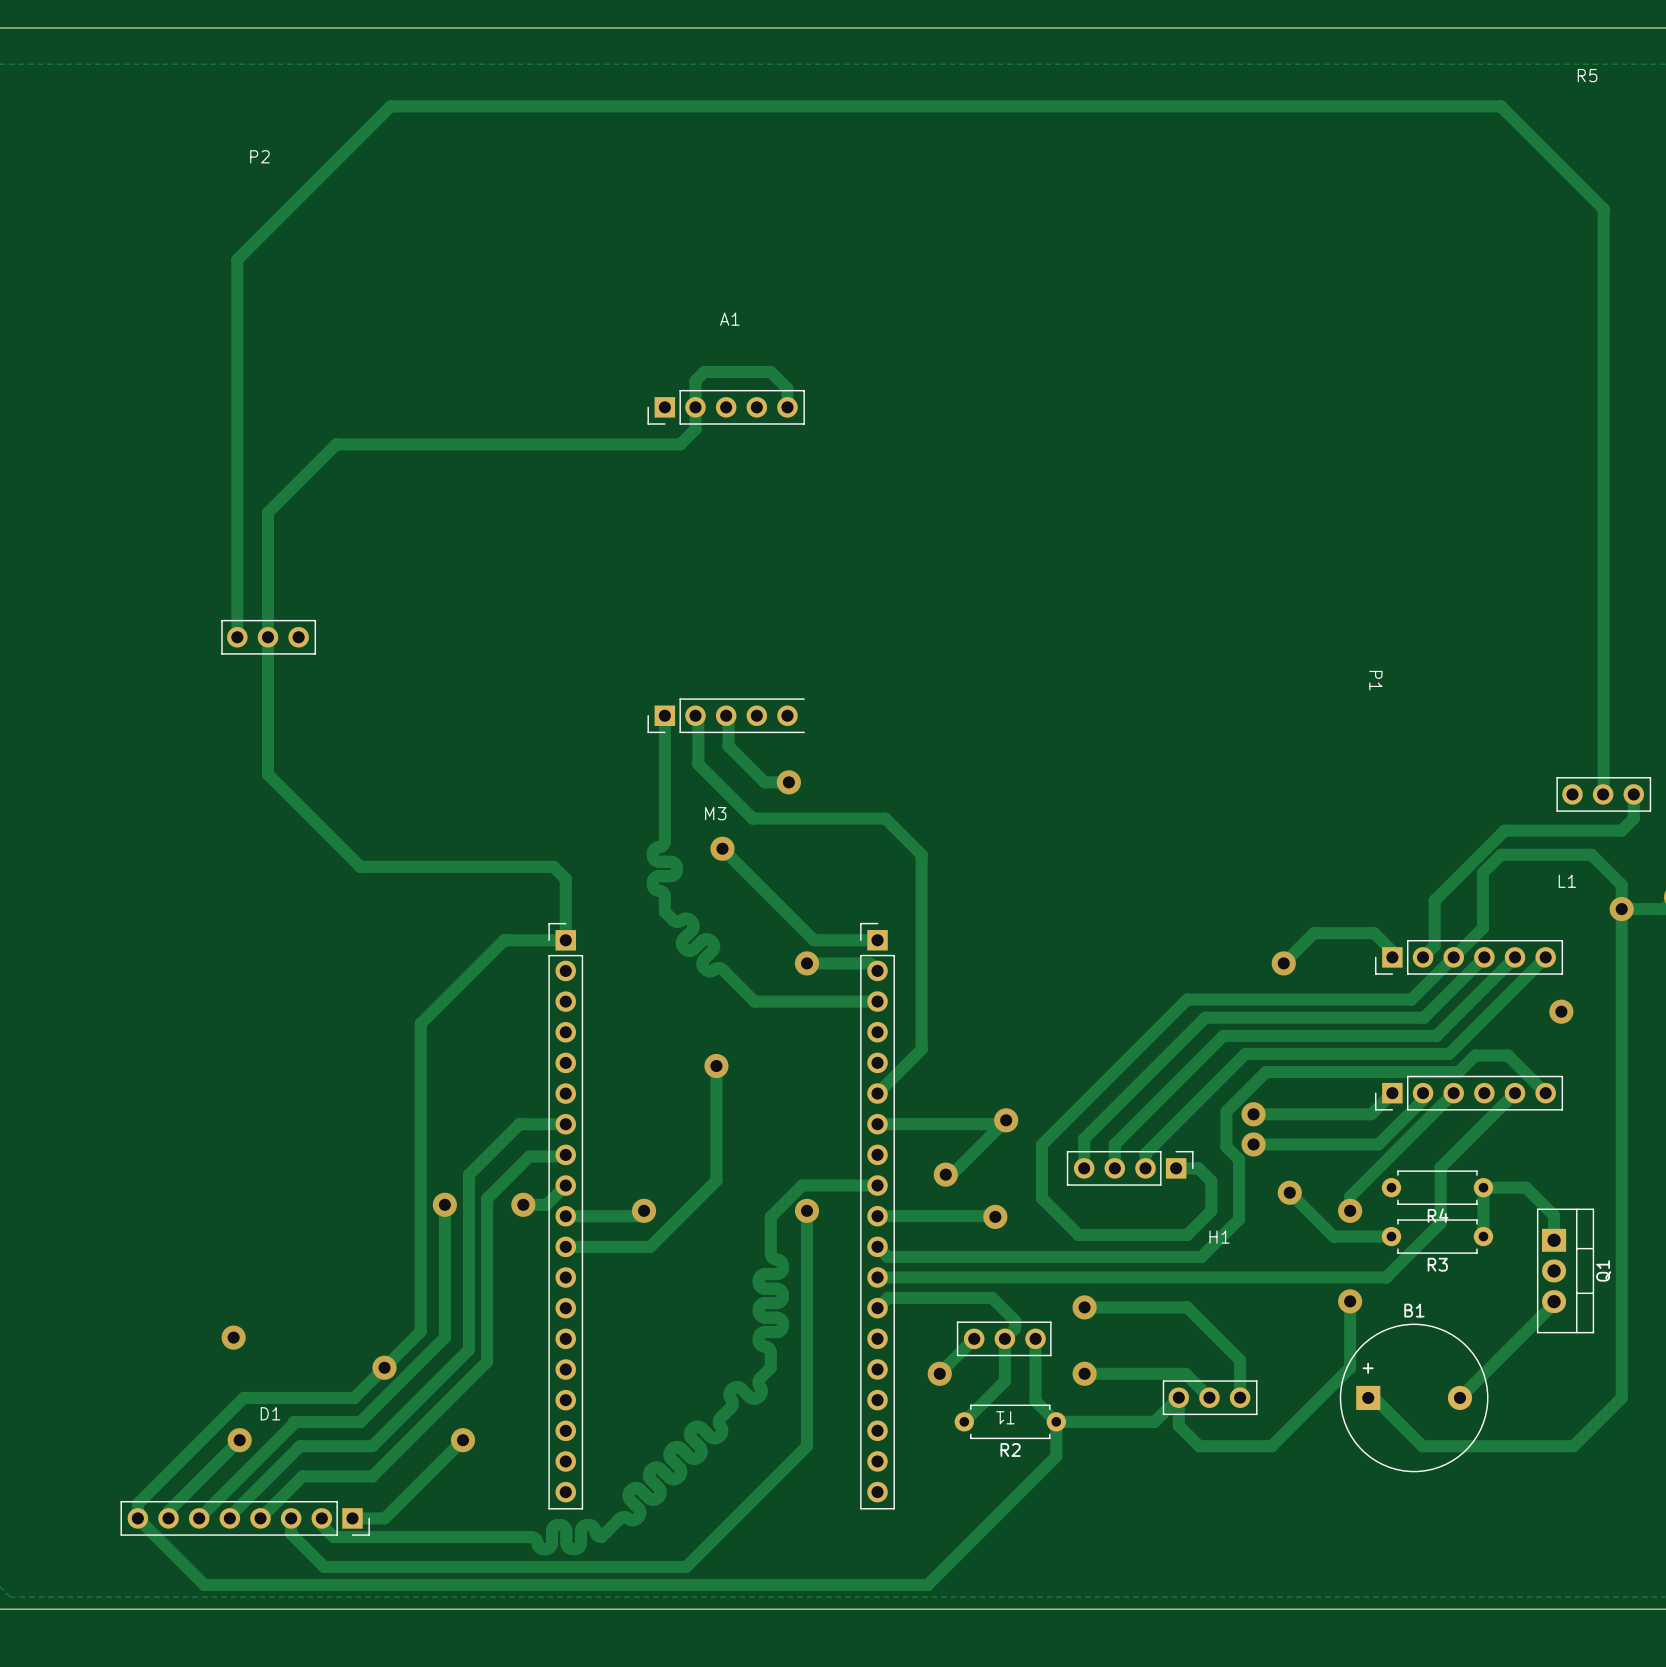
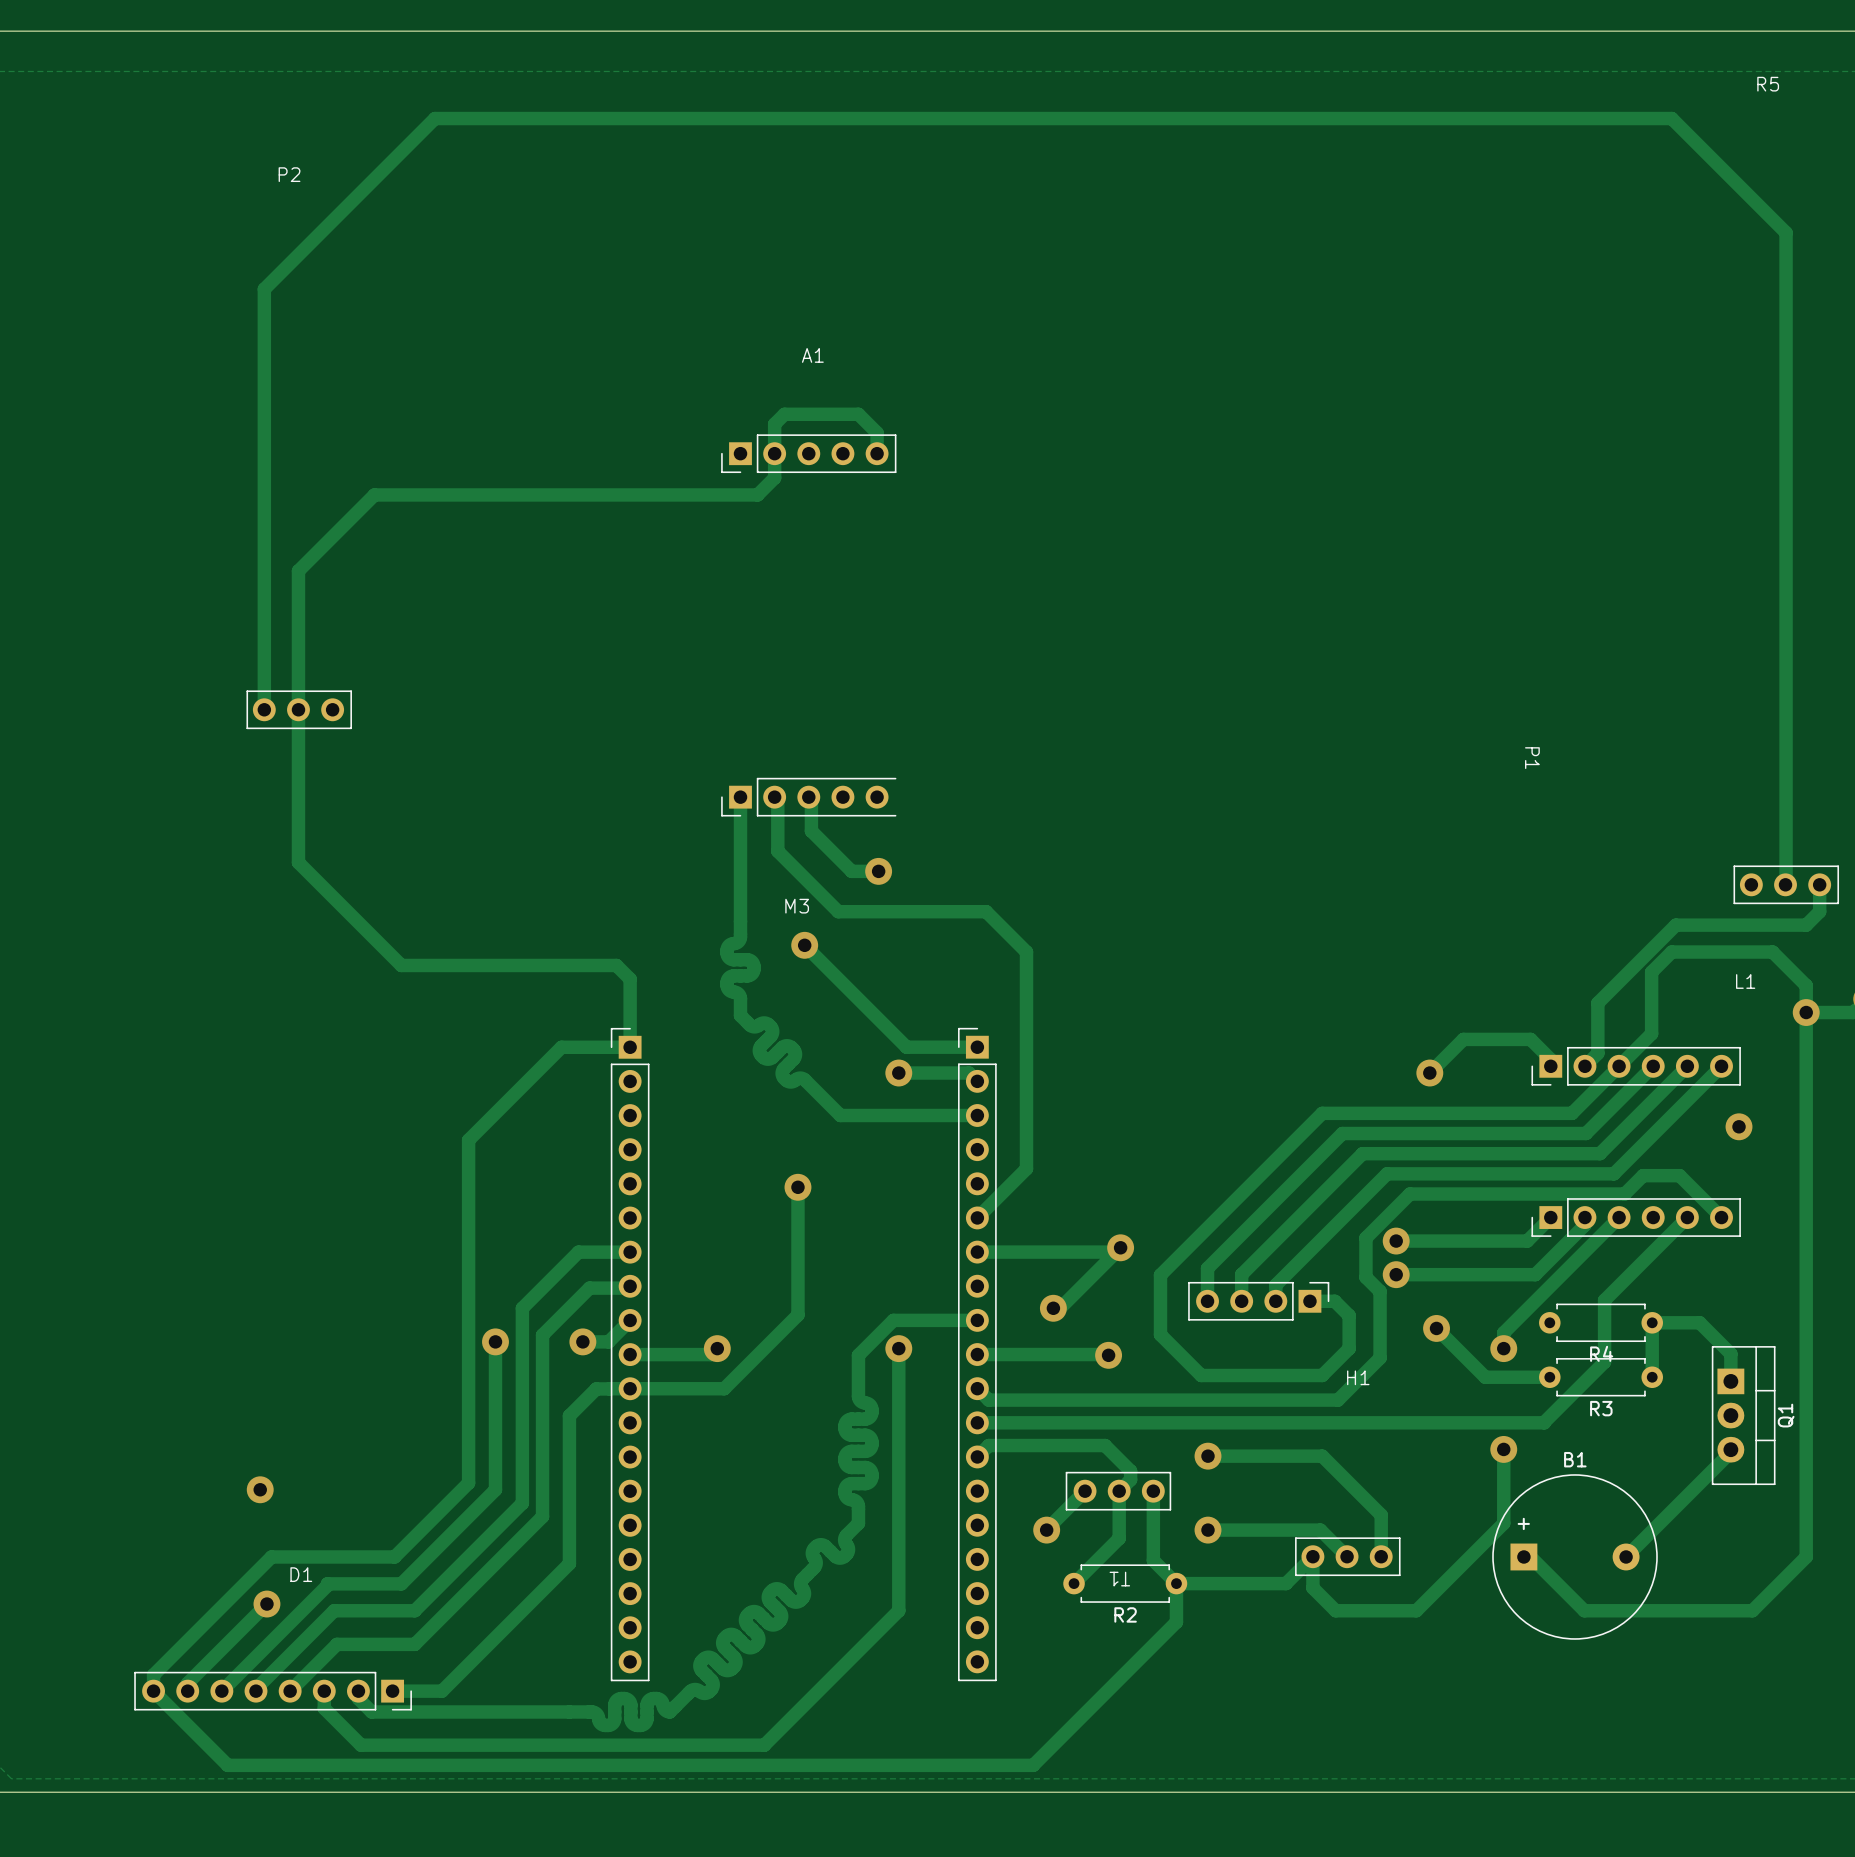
via: (384, 1367) -> none
track: (462, 1440) (384, 1518) -> (630, 1388) (596, 1388) (569, 1415) (569, 1563) (441, 1691) (428, 1691)
via: (462, 1440) -> none

